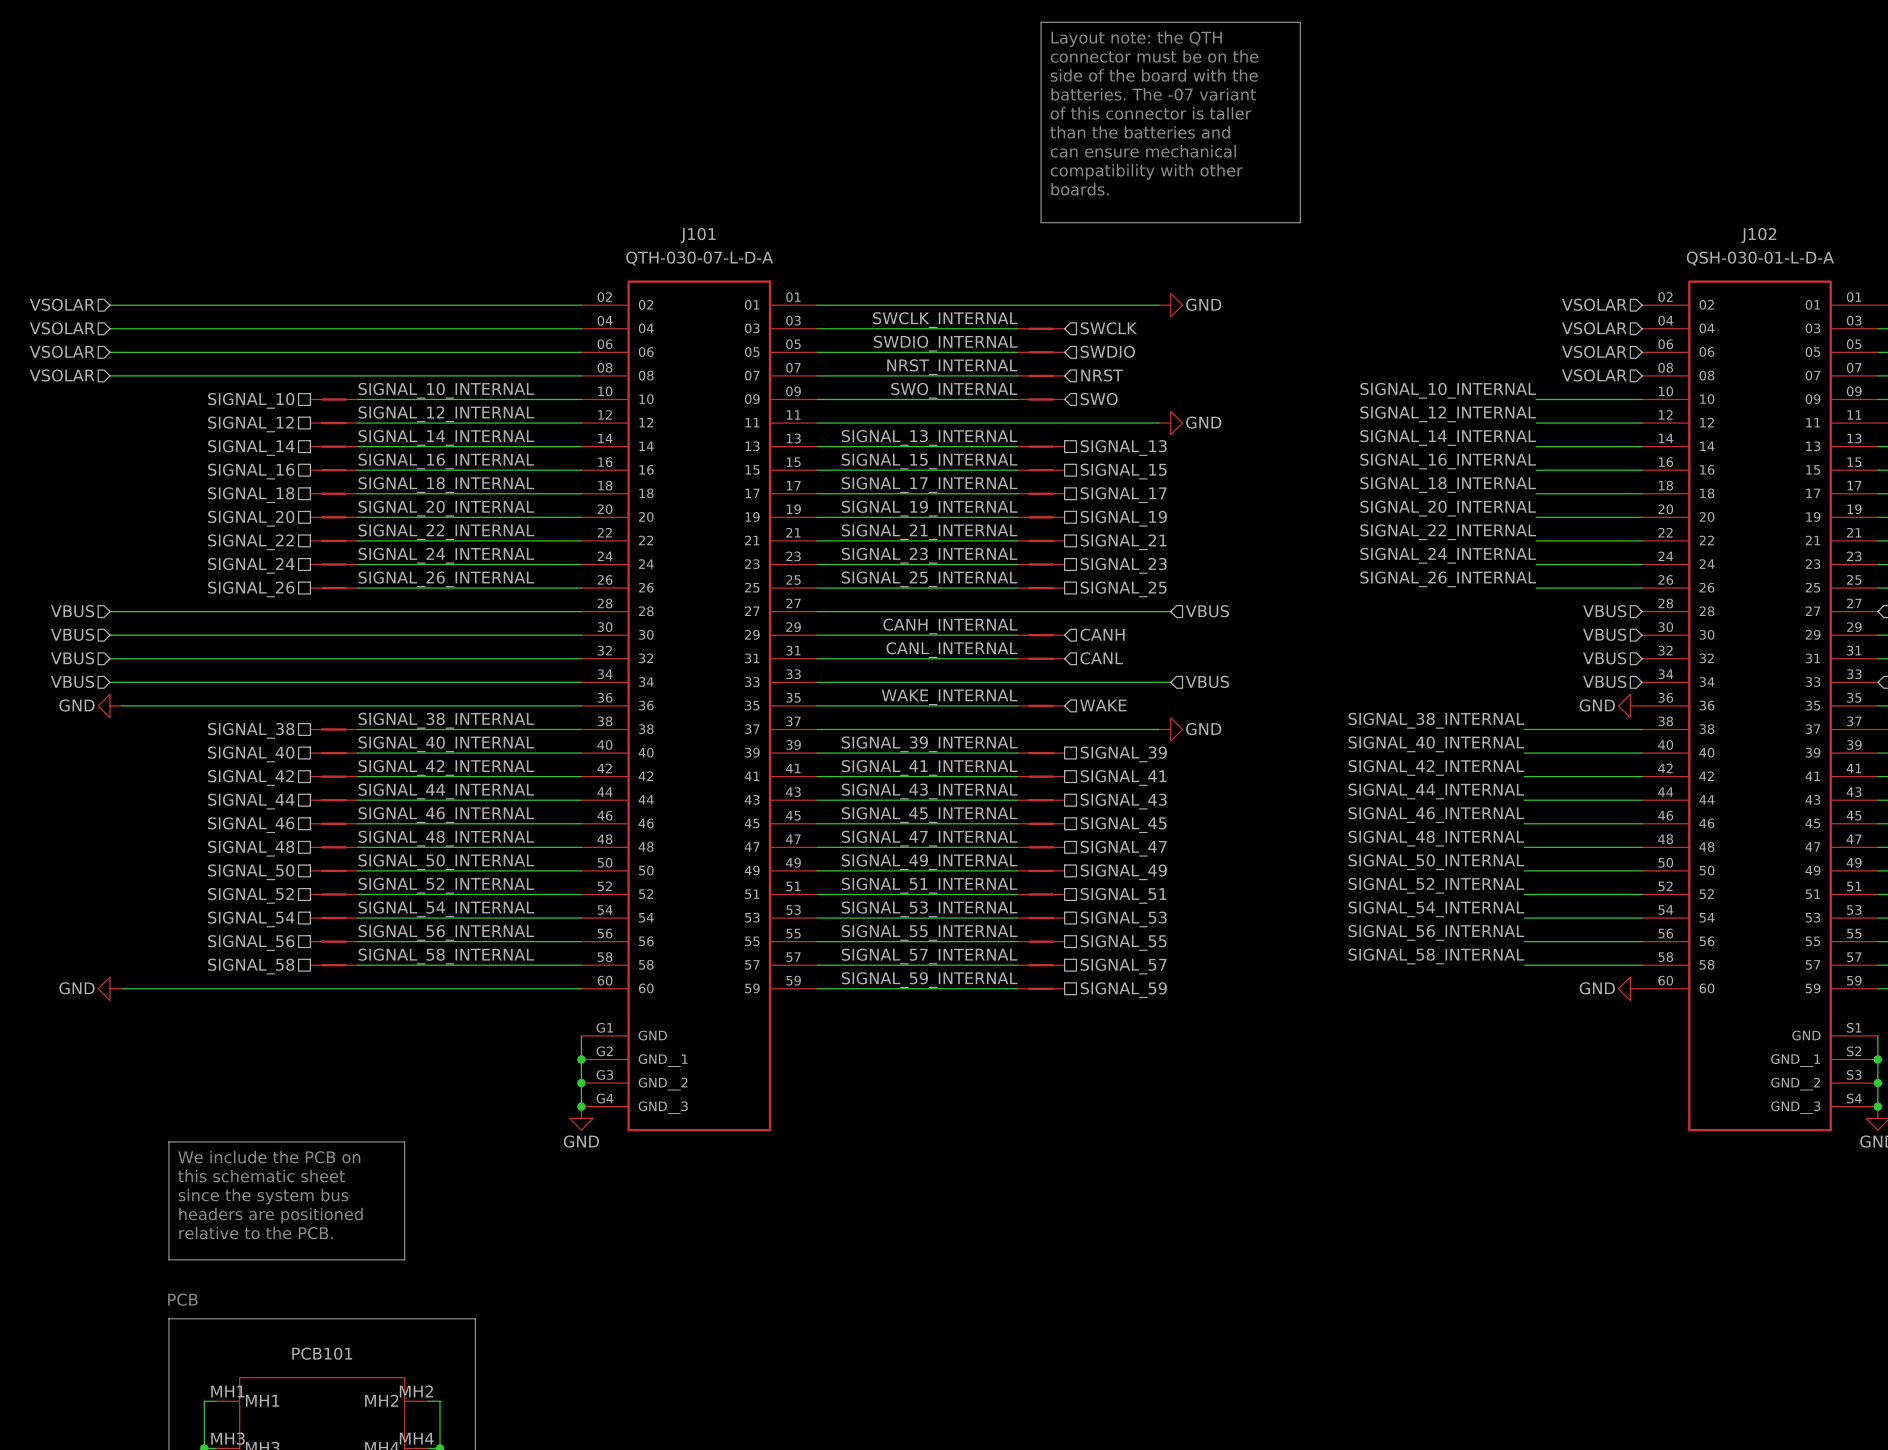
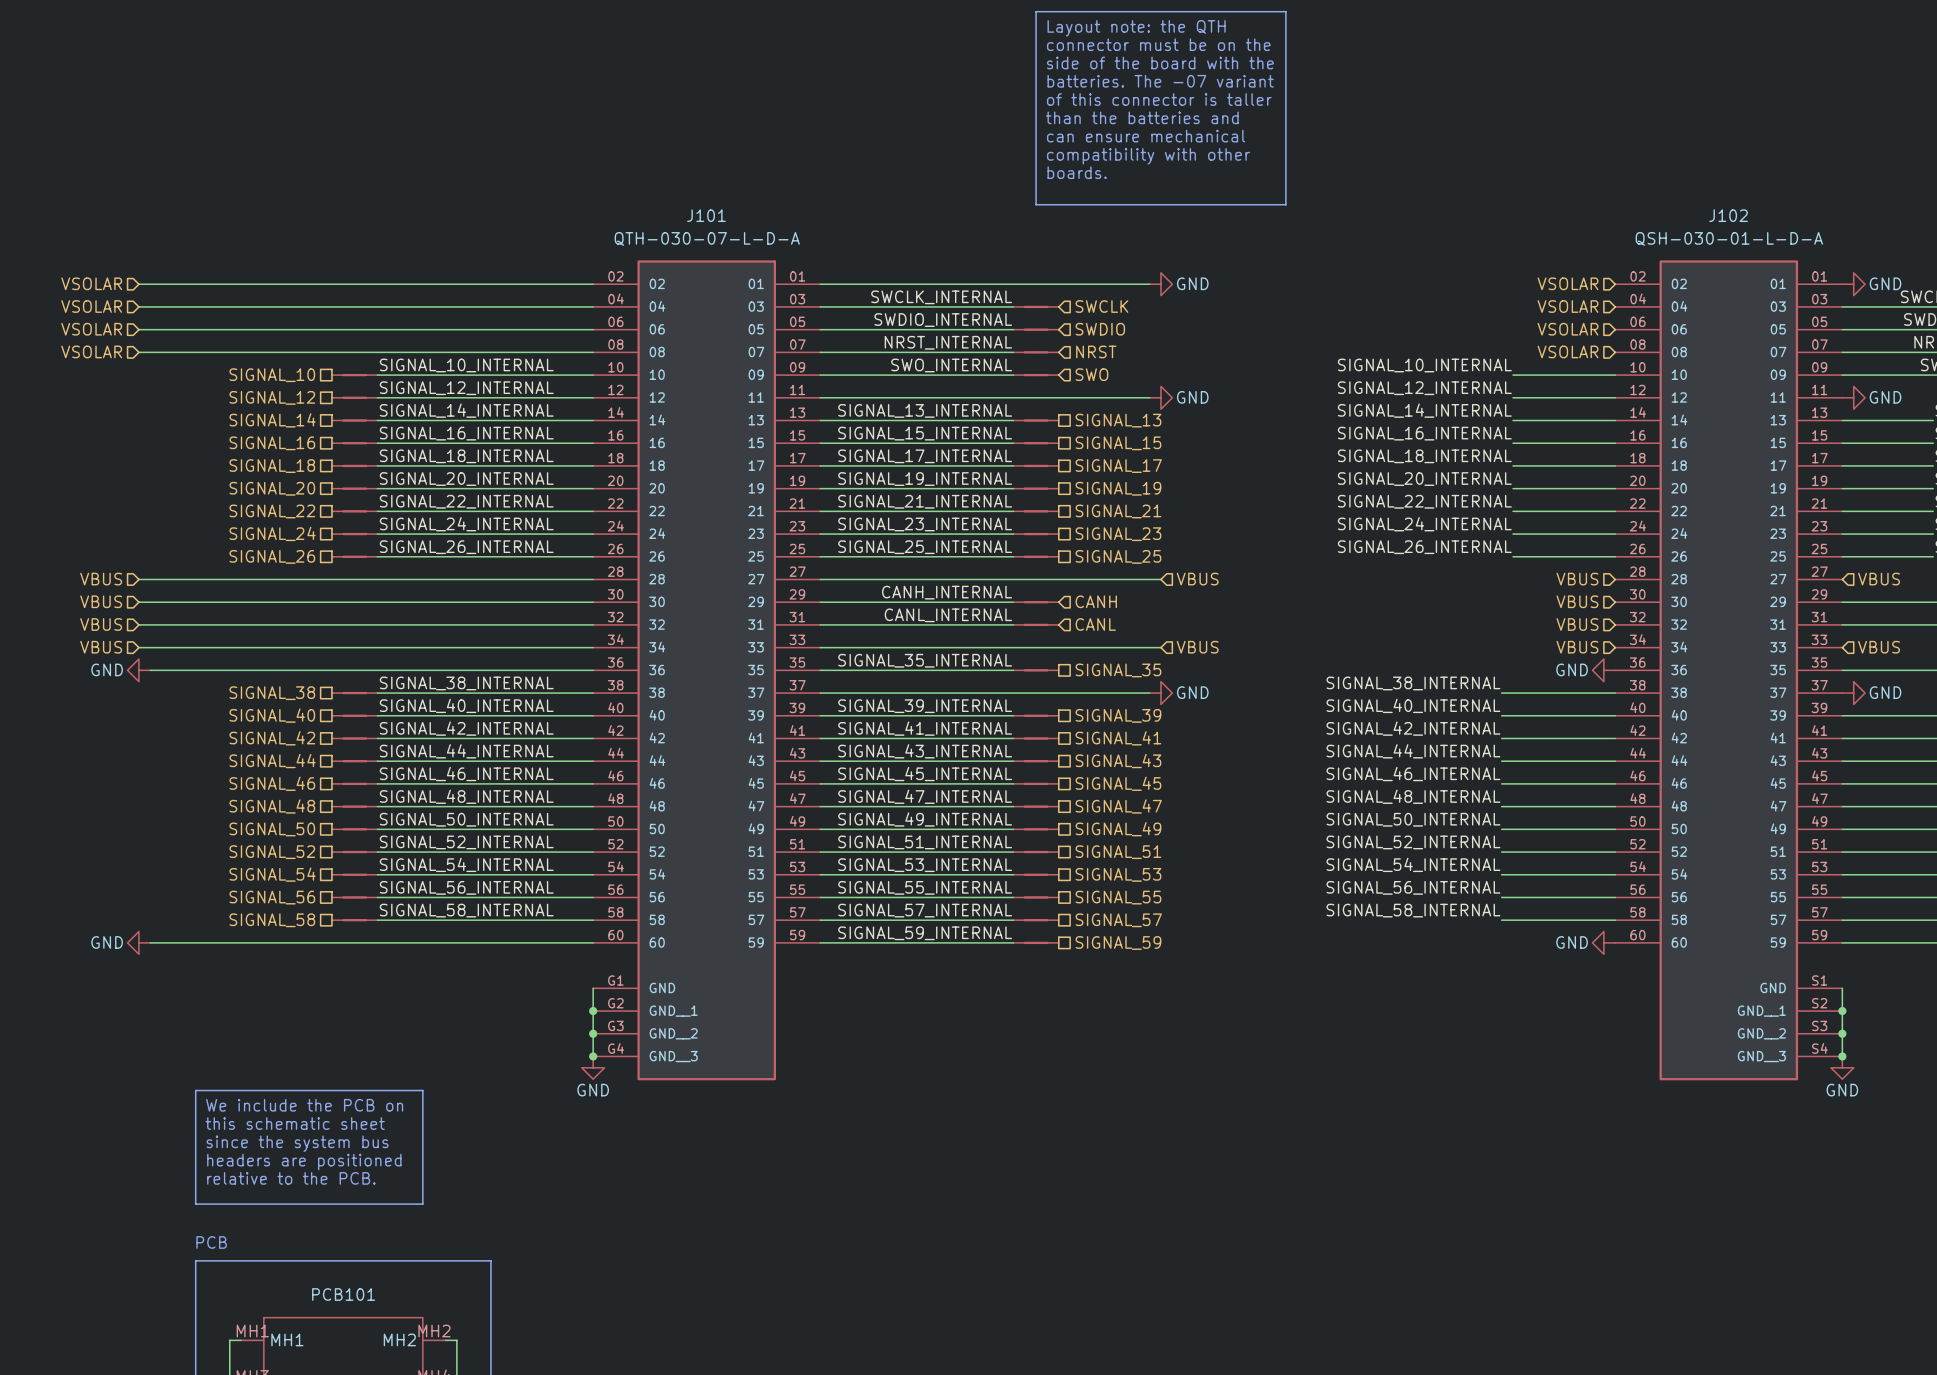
label: WAKE_INTERNAL (949, 697) -> SIGNAL_35_INTERNAL (925, 660)
hierarchical label shape: input (1103, 705) -> passive (1118, 670)
hierarchical label: WAKE (1103, 705) -> SIGNAL_35 (1118, 670)

